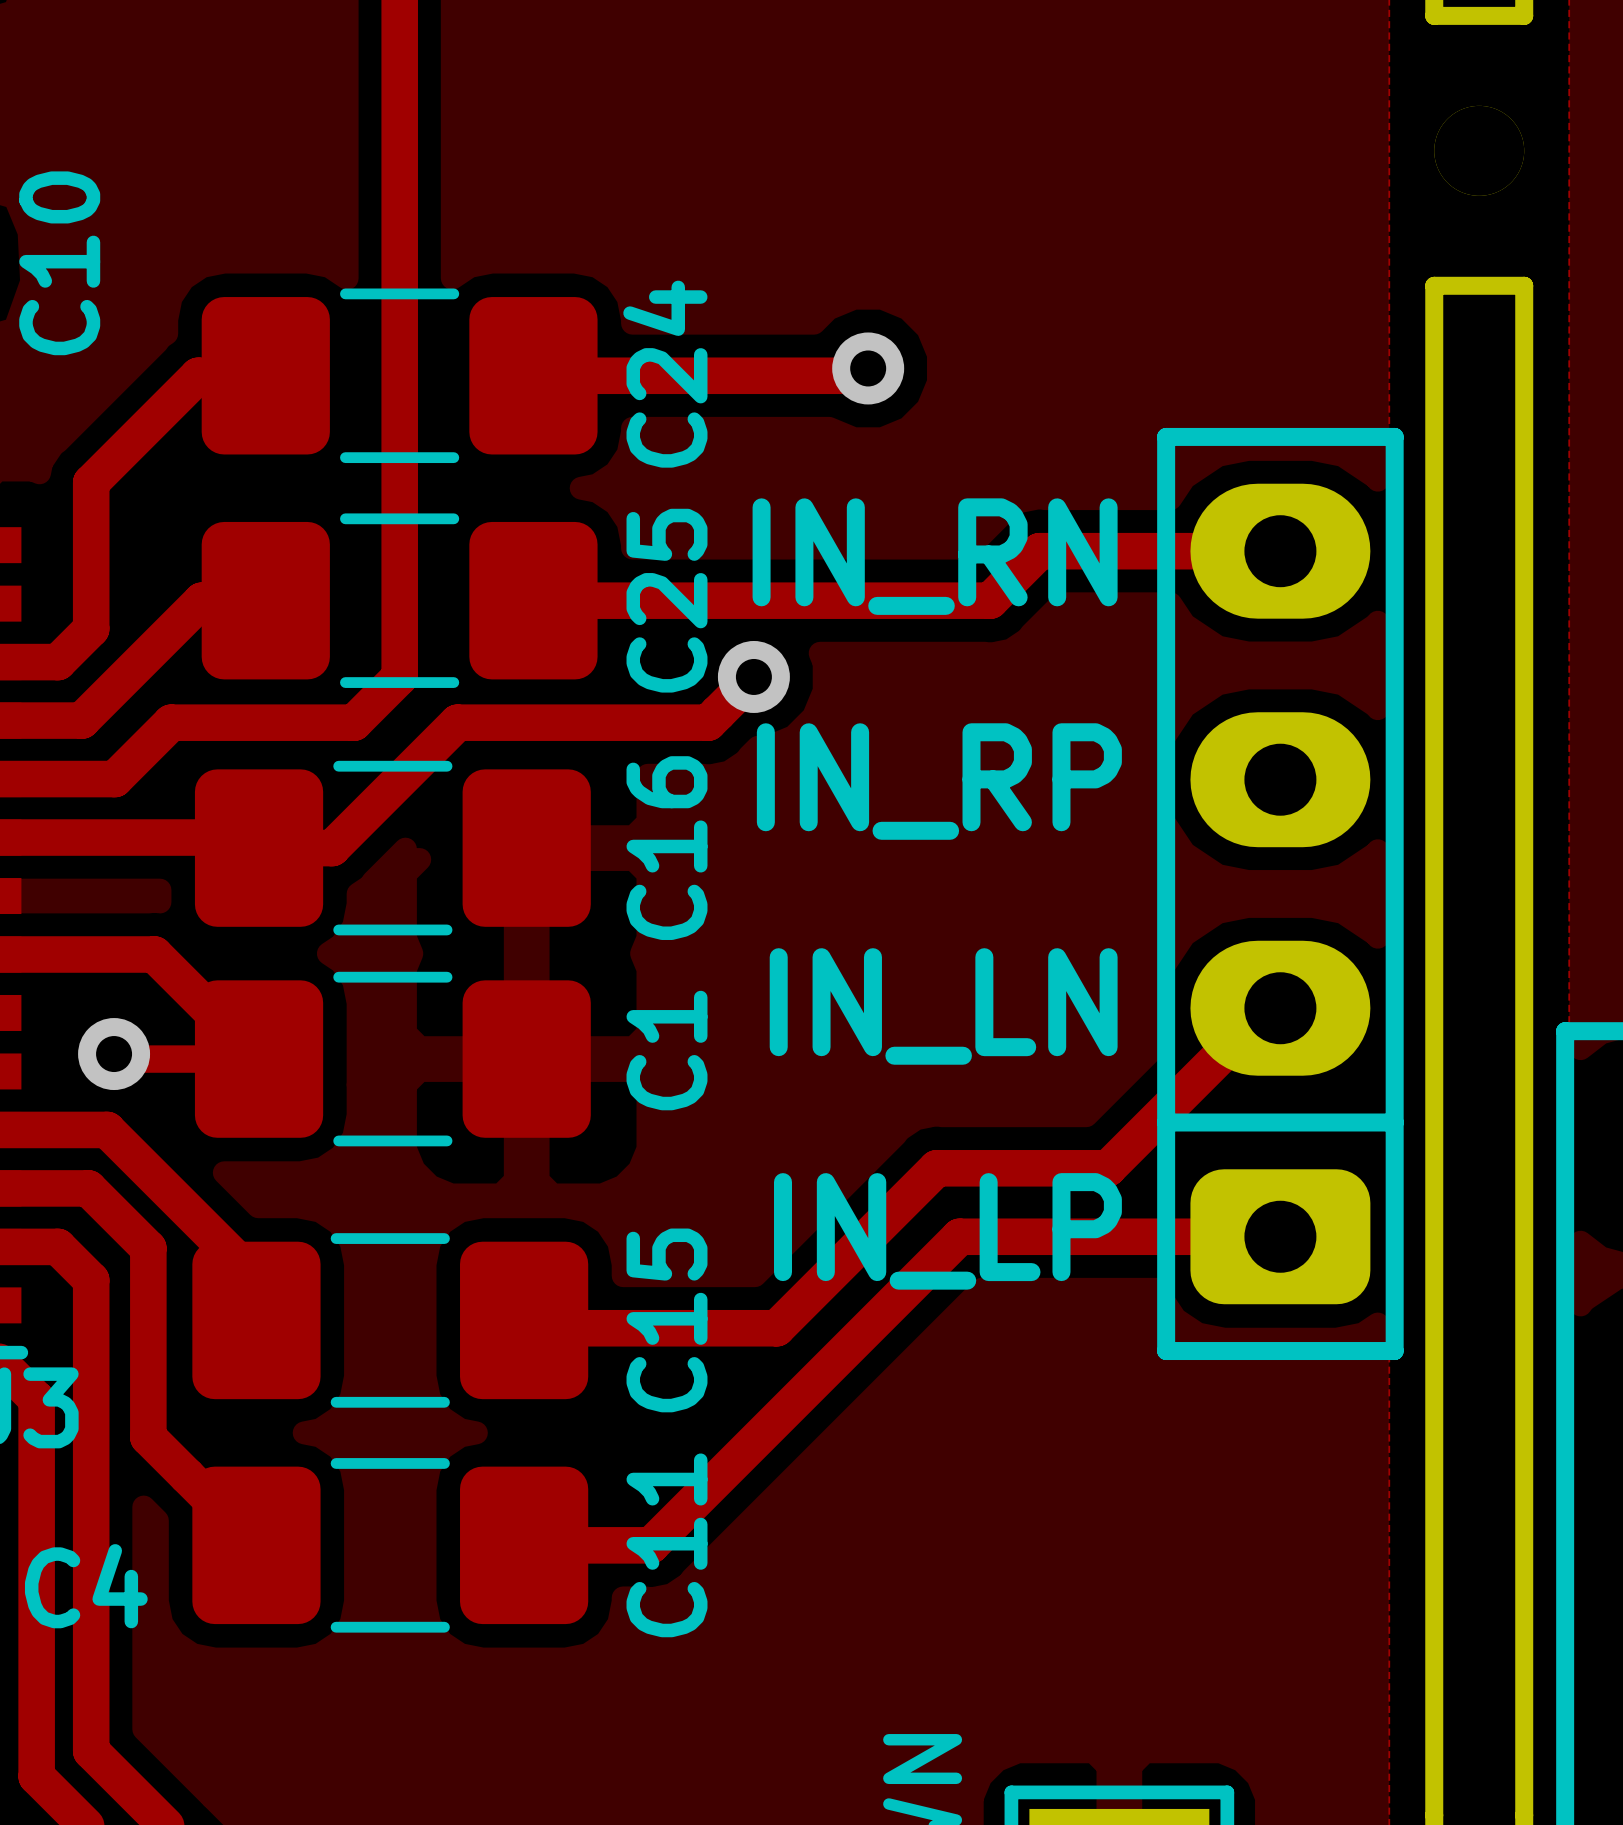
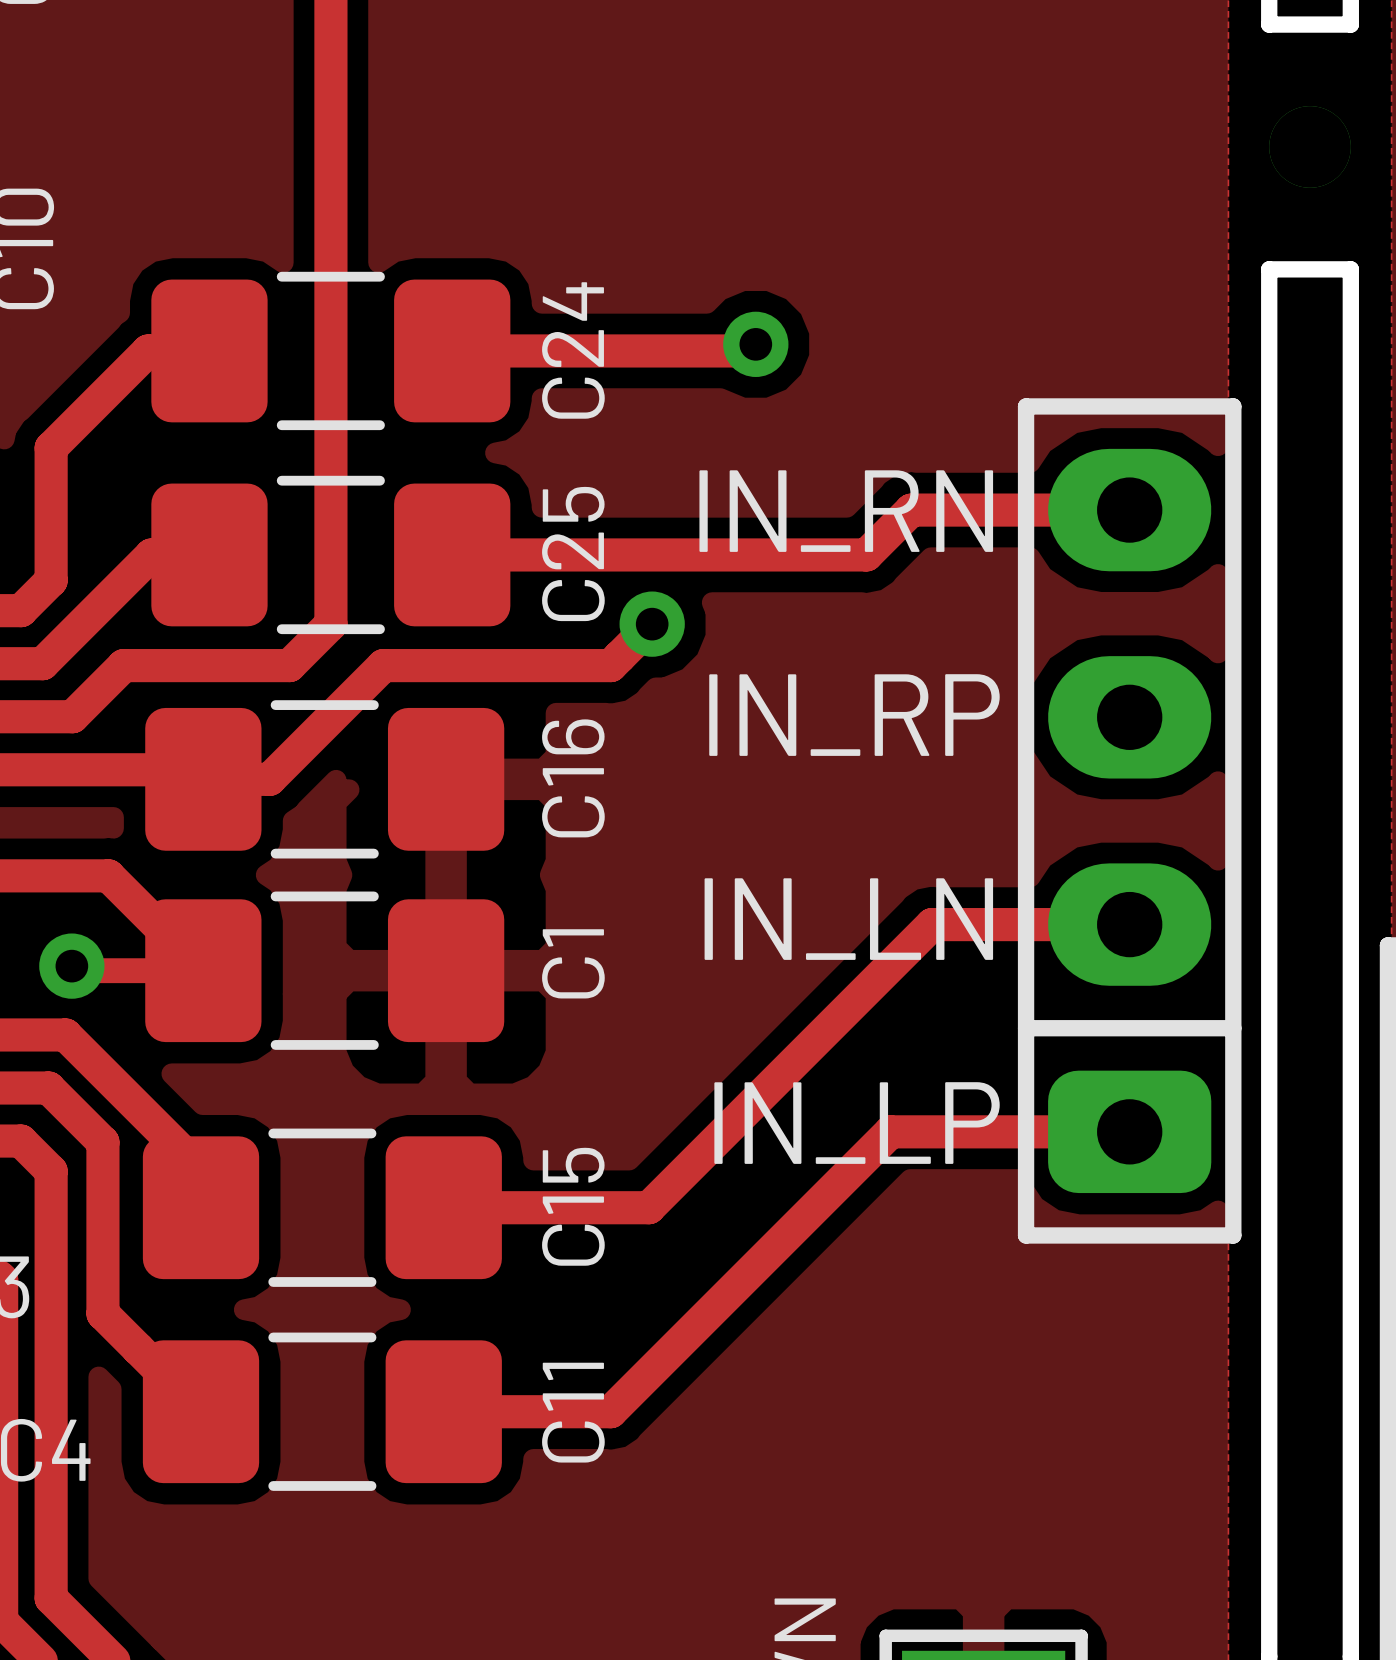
track: (1268, 1008) (1108, 1168) (936, 1168) (776, 1328) (531, 1328) (524, 1320) -> (1118, 924) (932, 924) (648, 1207) (443, 1207)
track: (1016, 1236) (959, 1236) (651, 1545) -> (890, 1131) (610, 1411) (558, 1411)

